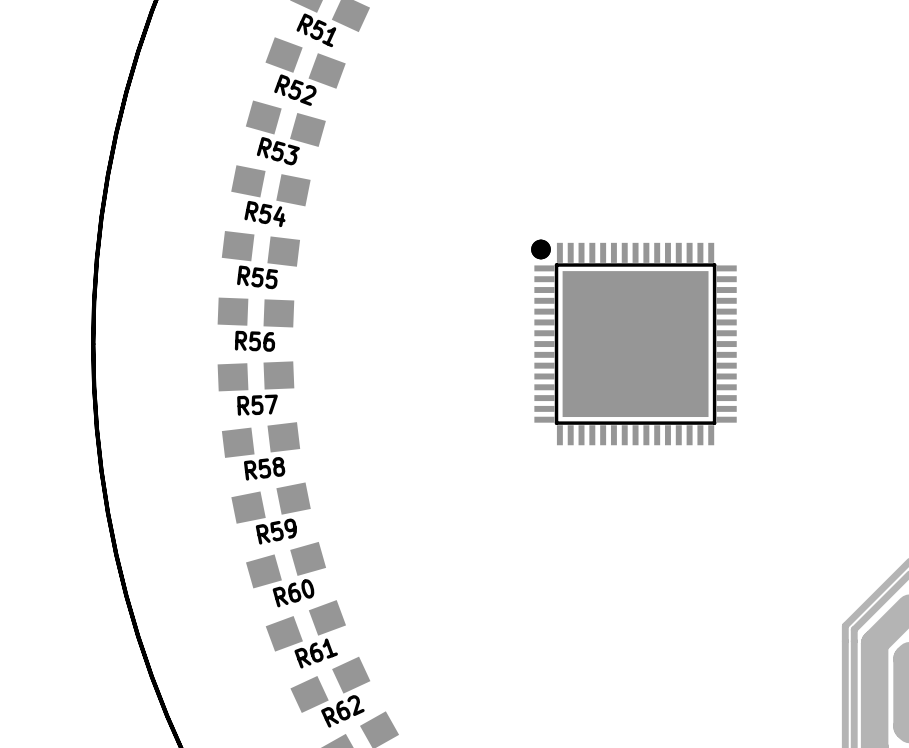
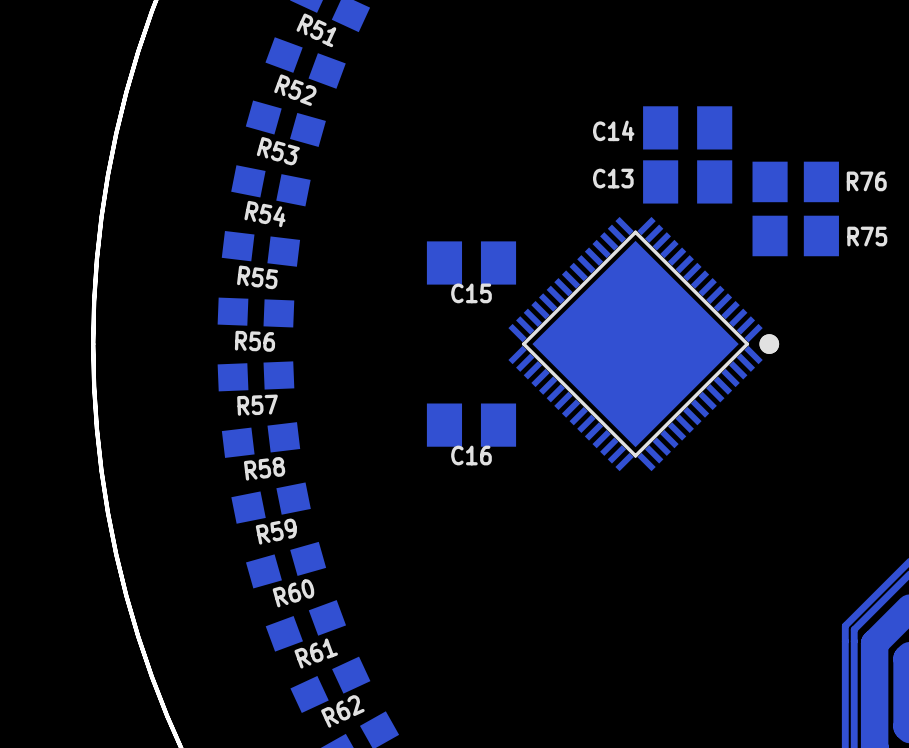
C14: none -> (687, 127)
C13: none -> (687, 181)
R75: none -> (795, 181)
R76: none -> (795, 235)
C15: none -> (471, 262)
part rotation: 0° (633, 342) -> 135° clockwise (643, 344)
C16: none -> (471, 425)

